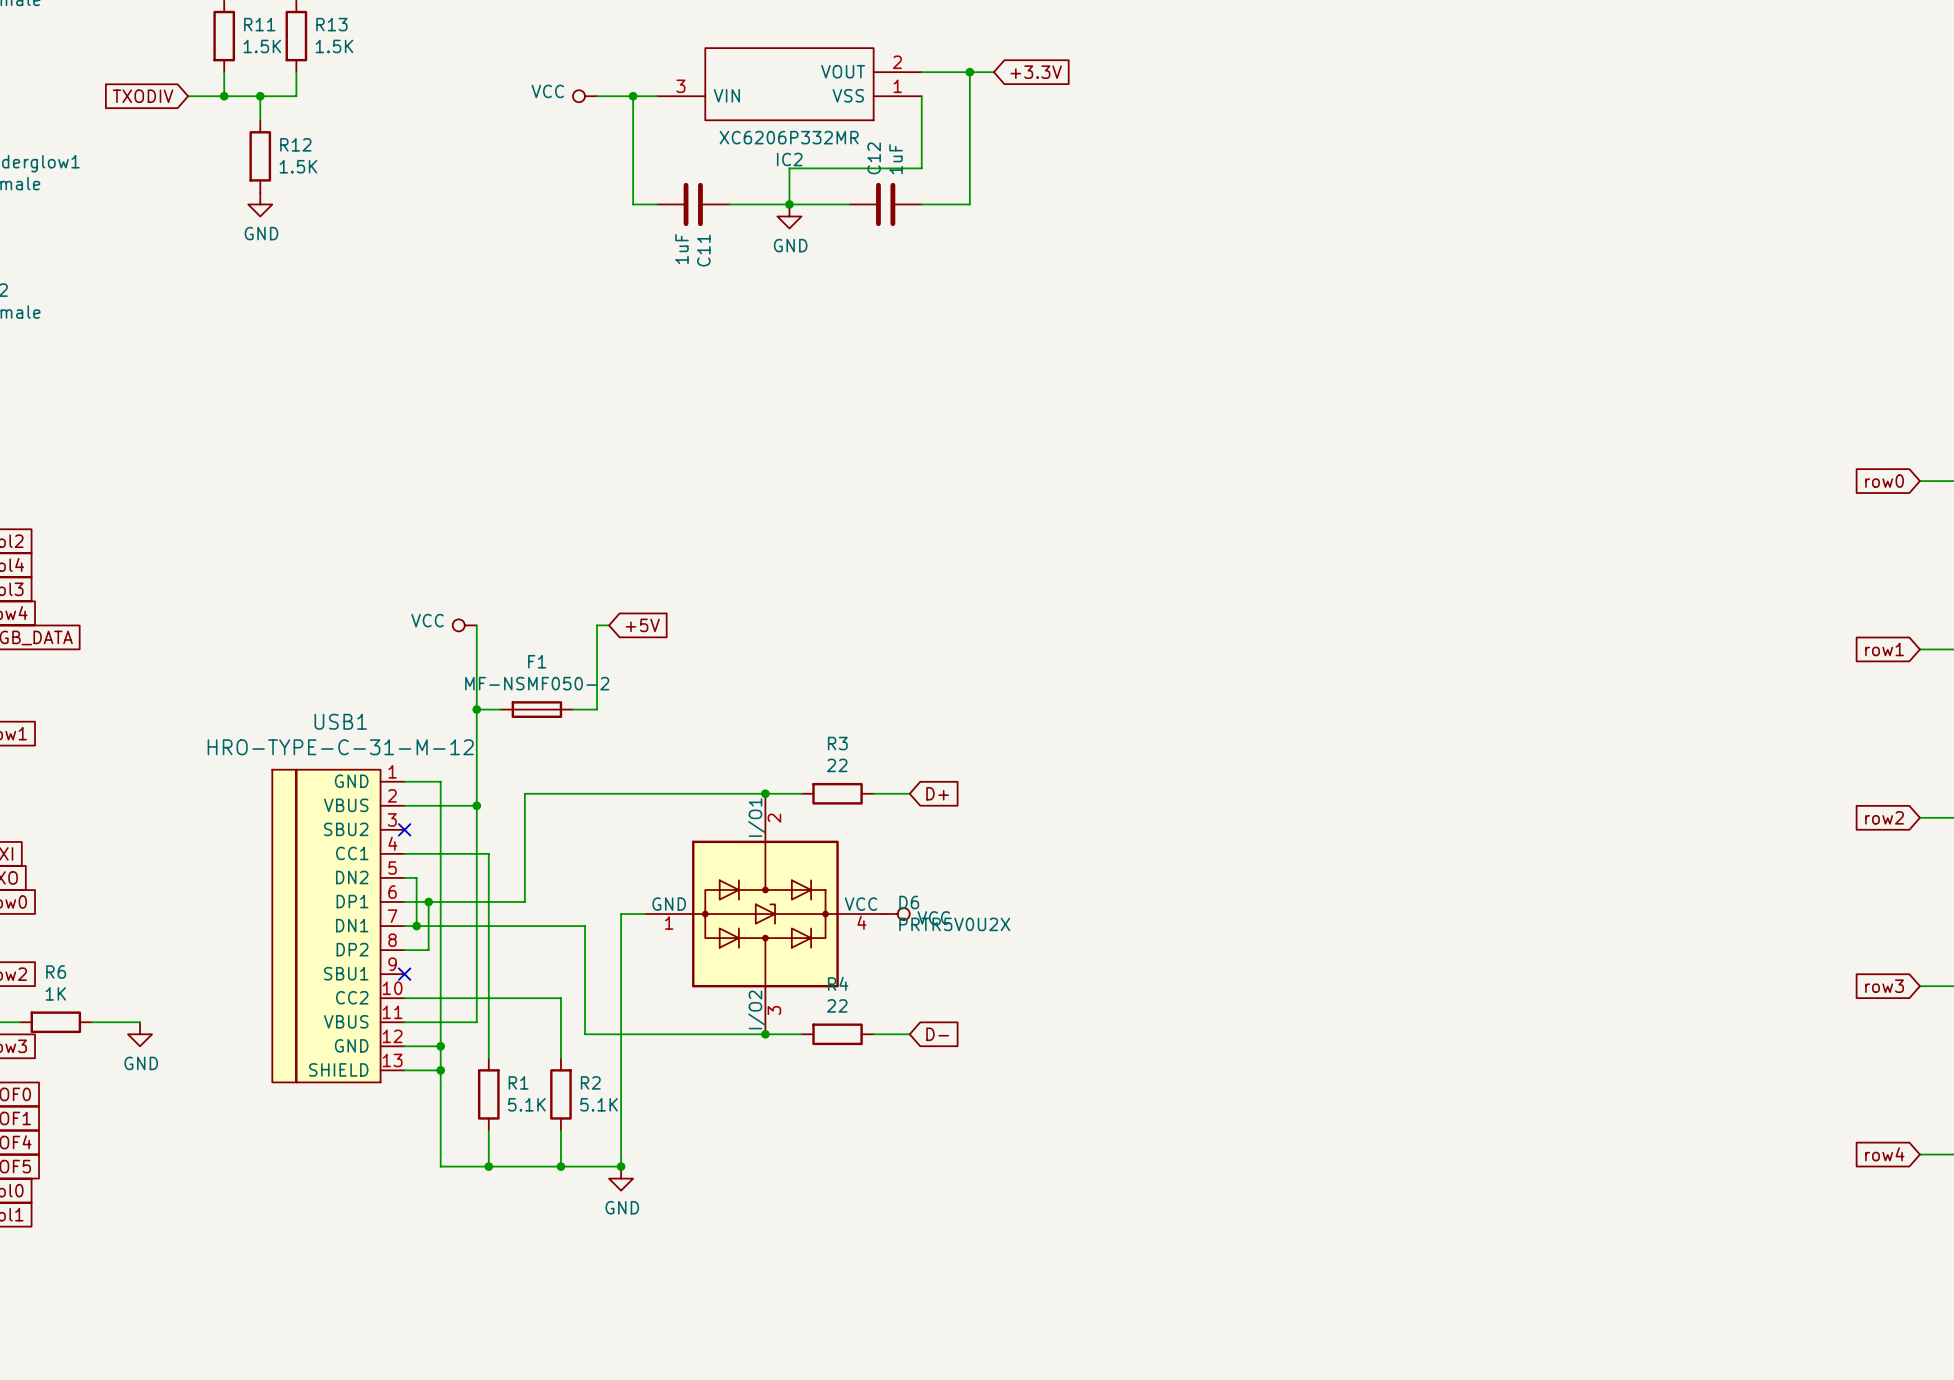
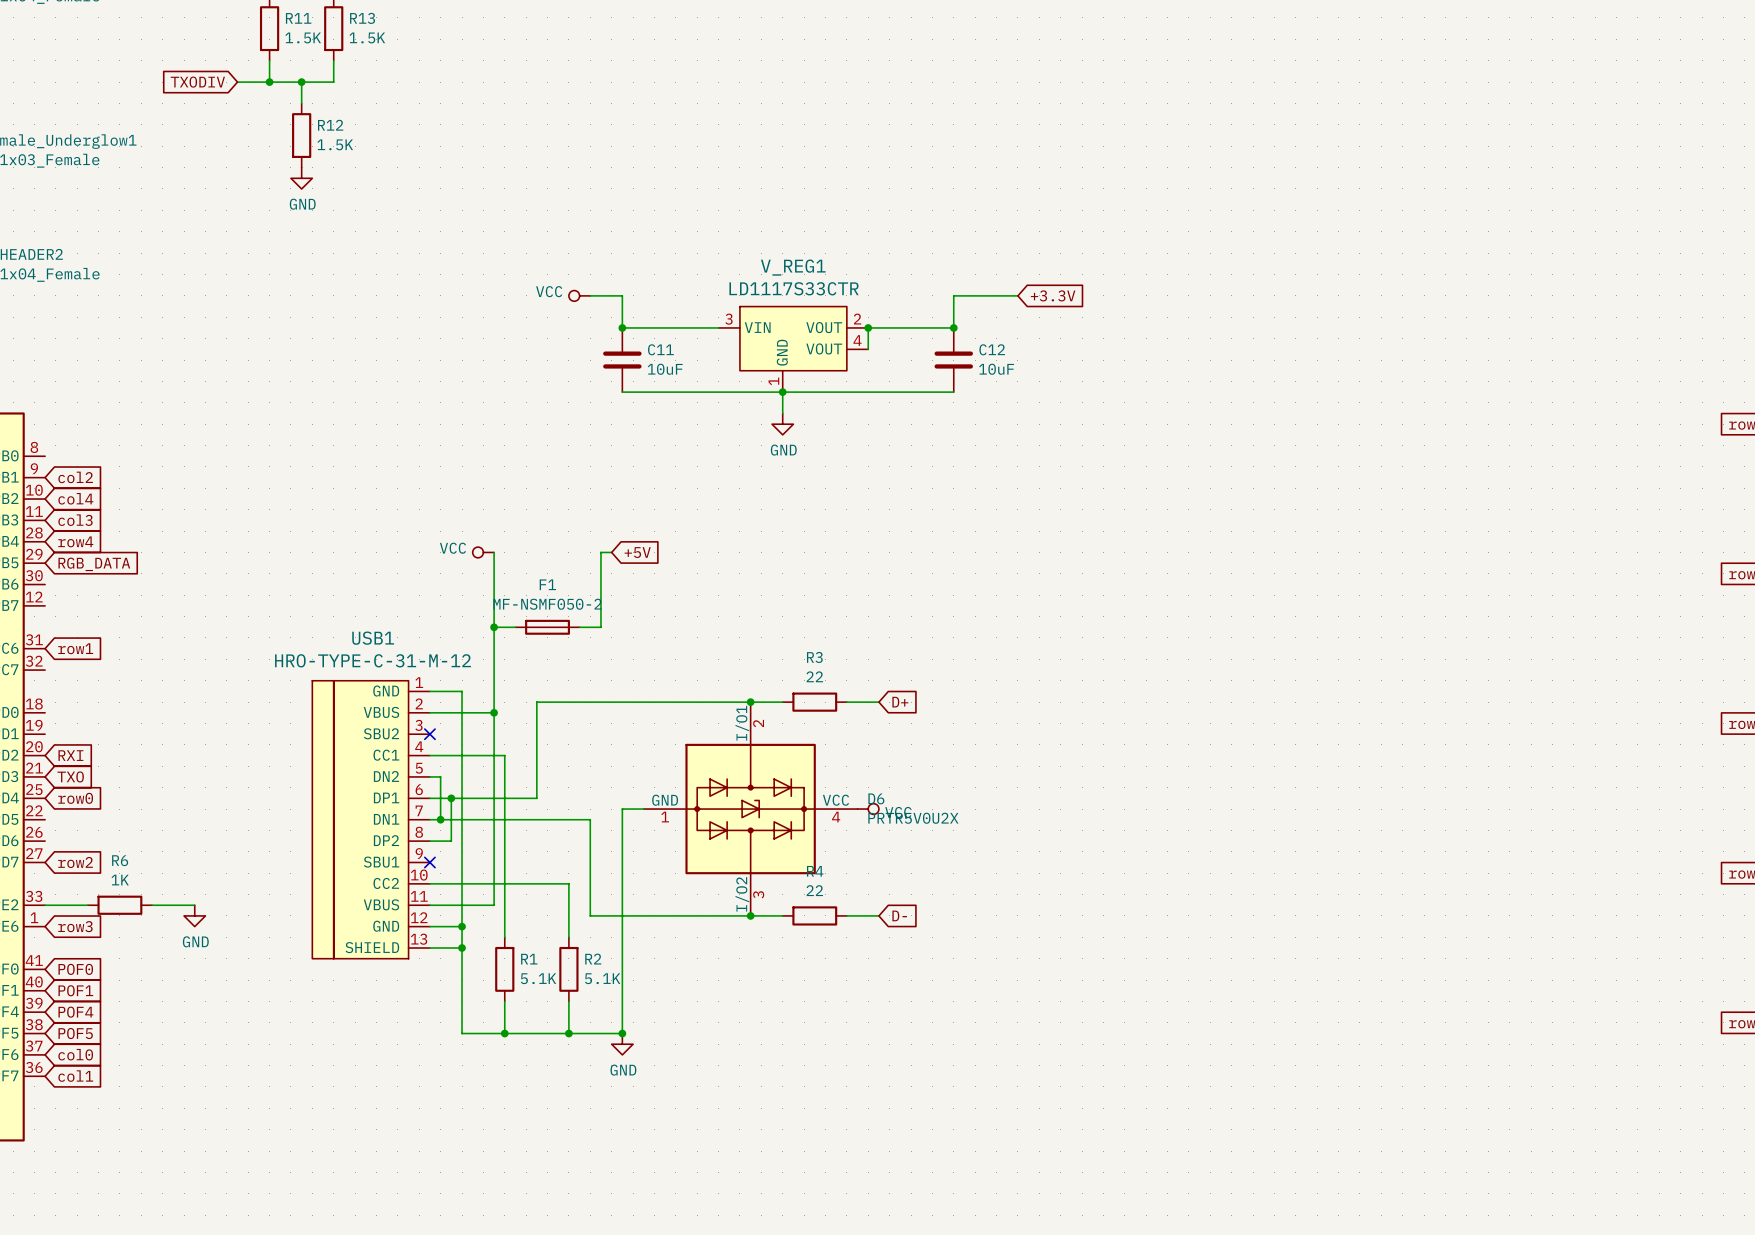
wire: (921, 72) (993, 72) -> none
wire: (969, 72) (969, 204) (921, 204) -> none
junction: (969, 72) -> none
global label: +3.3V (1036, 72) -> none
IC2: XC6206P332MR (789, 84) -> none
power symbol: VCC (585, 96) -> none
wire: (597, 96) (657, 96) -> none
wire: (633, 96) (633, 204) (657, 204) -> none
junction: (633, 96) -> none
wire: (921, 96) (921, 168) (789, 168) (789, 204) -> none
C12 value: 1uF (896, 159) -> 10uF (996, 369)
C11 rotation: 0° (693, 204) -> 90° clockwise (622, 360)
C11 position: (693, 204) -> (622, 360)
wire: (729, 204) (849, 204) -> none
junction: (789, 204) -> none
C12 rotation: 0° (885, 204) -> 90° clockwise (953, 360)
C12 position: (885, 204) -> (953, 360)
power symbol: GND (789, 216) -> none
C11 value: 1uF (681, 249) -> 10uF (665, 369)
C11 name position: C11 (703, 250) -> C11 (660, 349)
power symbol: none -> VCC (579, 295)
wire: none -> (590, 295) (622, 295) (622, 327) (718, 327)
wire: none -> (1017, 295) (953, 295) (953, 327) (868, 327) (868, 349)
global label: none -> +3.3V (1053, 295)
junction: none -> (622, 327)
junction: none -> (868, 327)
junction: none -> (953, 327)
V_REG1: none -> LD1117S33CTR (793, 349)
wire: none -> (622, 392) (953, 392)
wire: none -> (782, 392) (782, 413)
junction: none -> (782, 392)
power symbol: none -> GND (782, 424)

